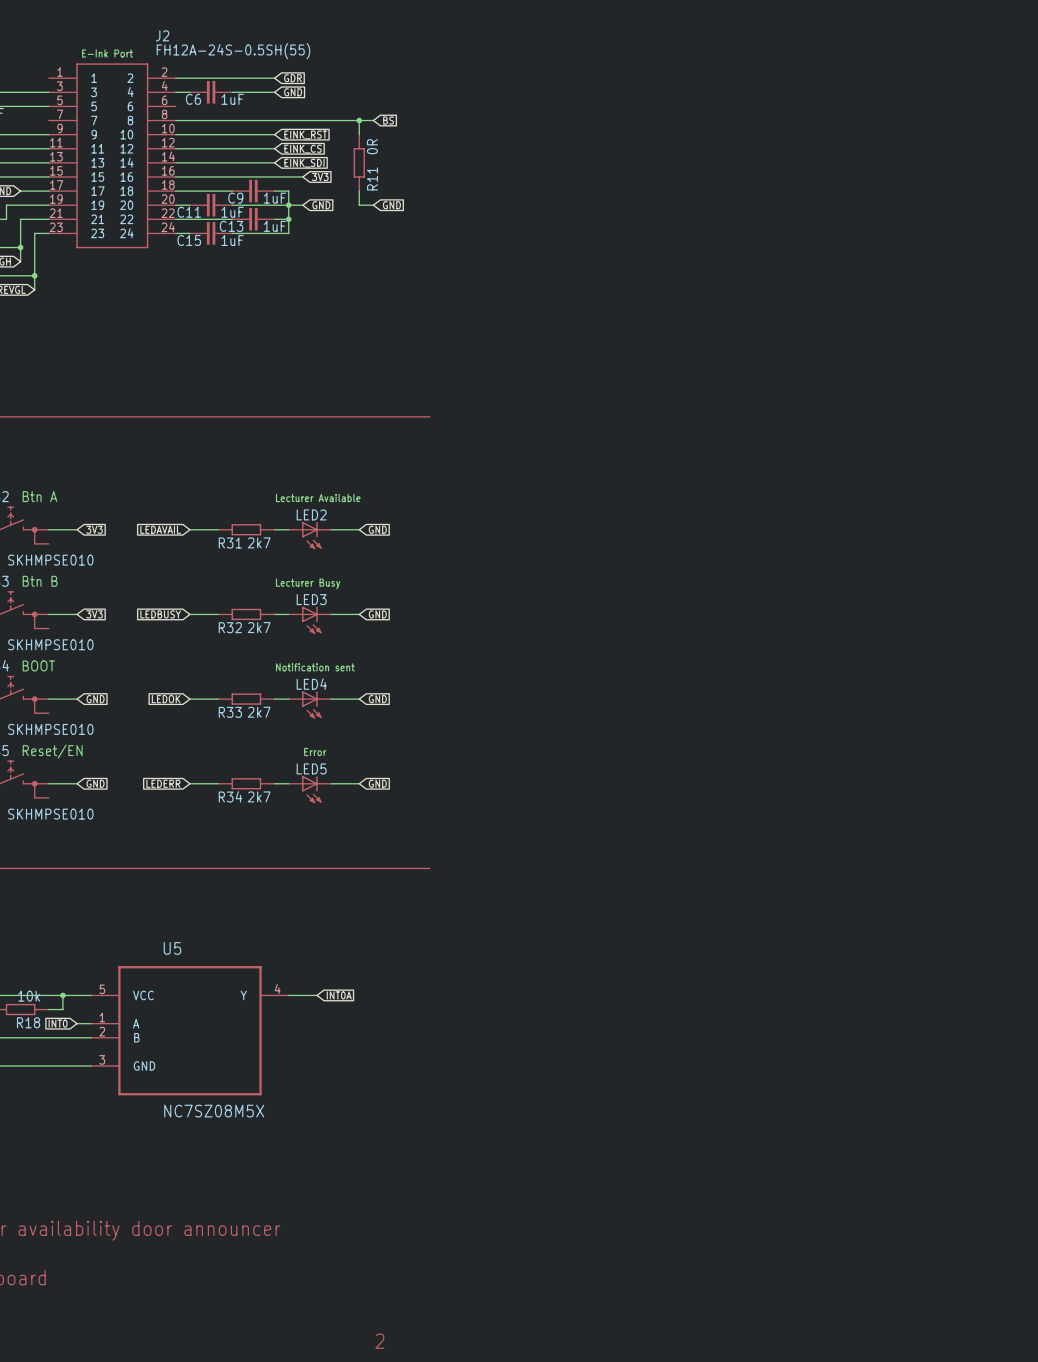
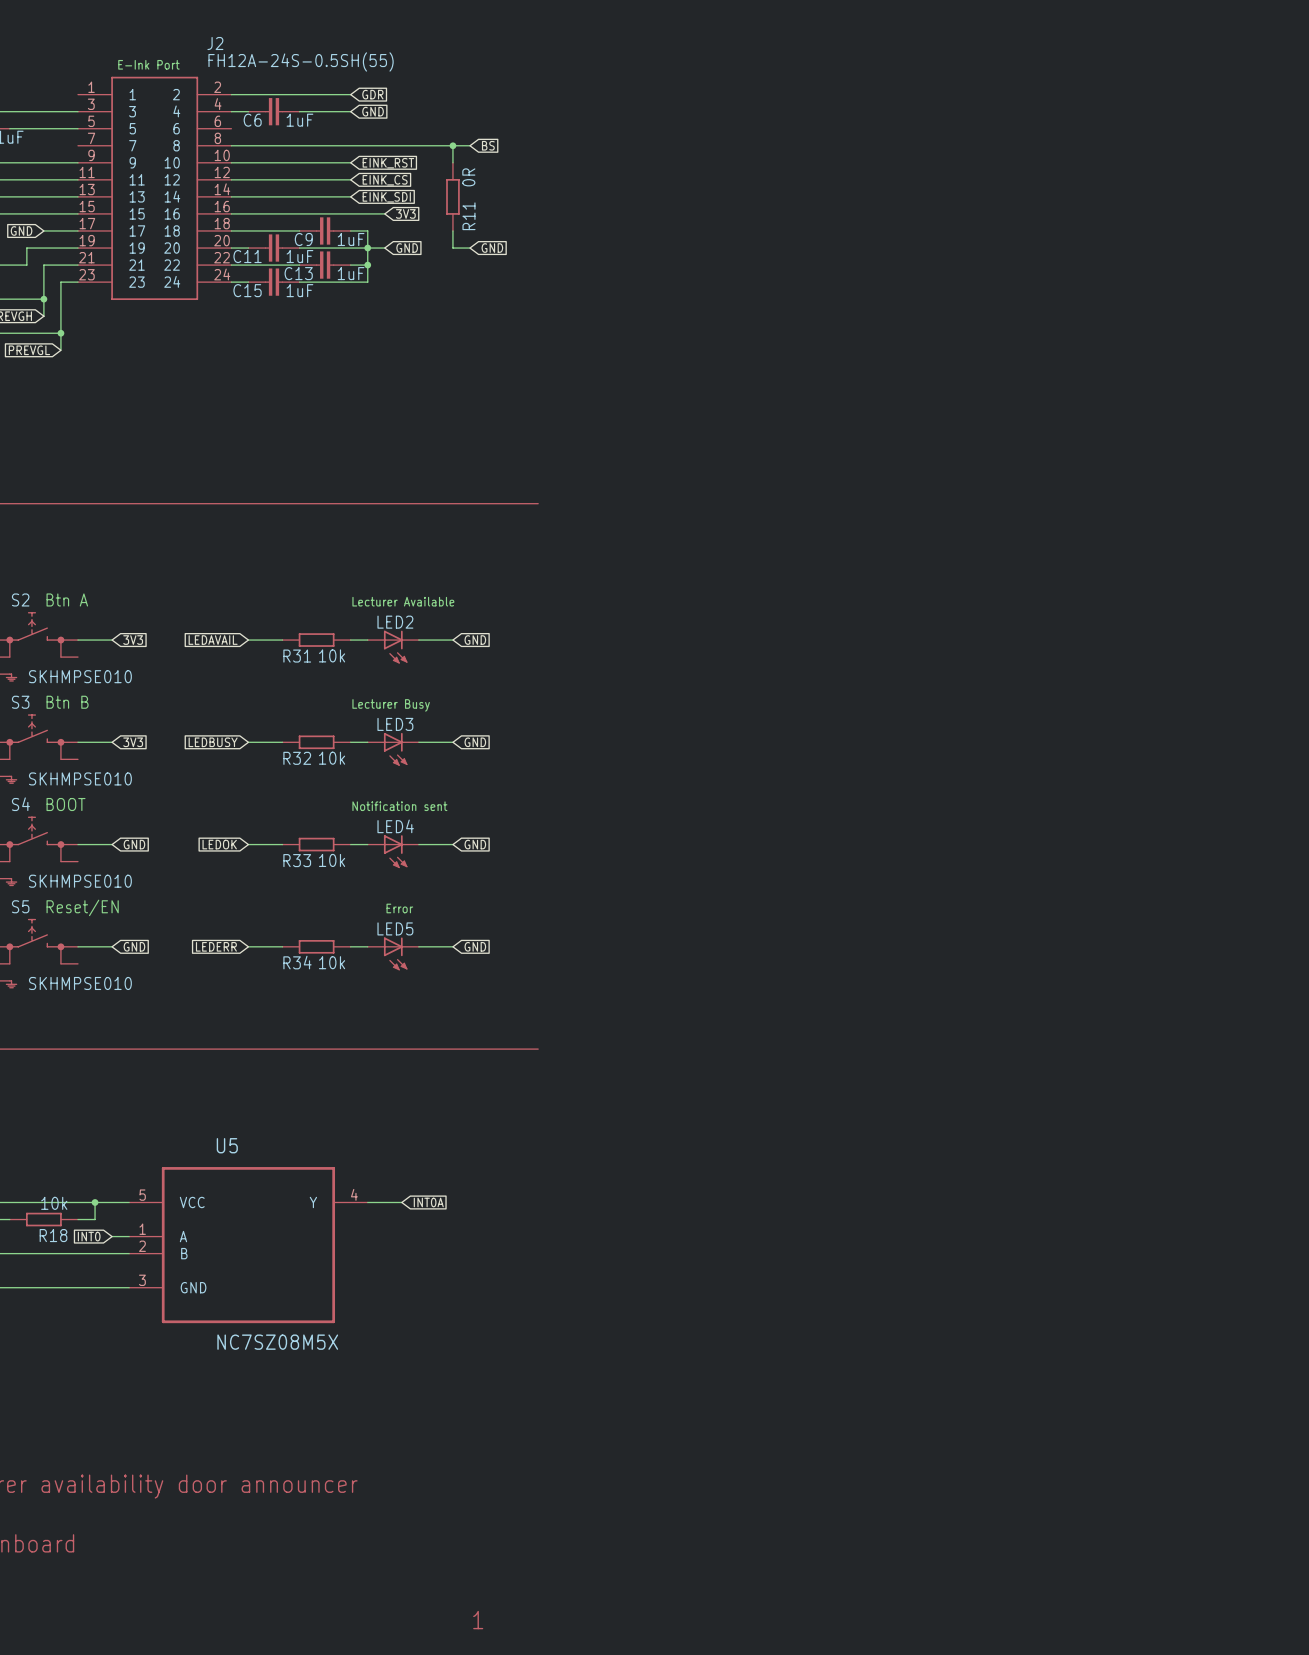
R31 value: 2k7 (259, 542) -> 10k (332, 655)
R32 value: 2k7 (259, 627) -> 10k (332, 758)
R33 value: 2k7 (259, 712) -> 10k (332, 860)
R34 value: 2k7 (259, 796) -> 10k (332, 962)
text: 2 (379, 1341) -> 1 (478, 1620)

